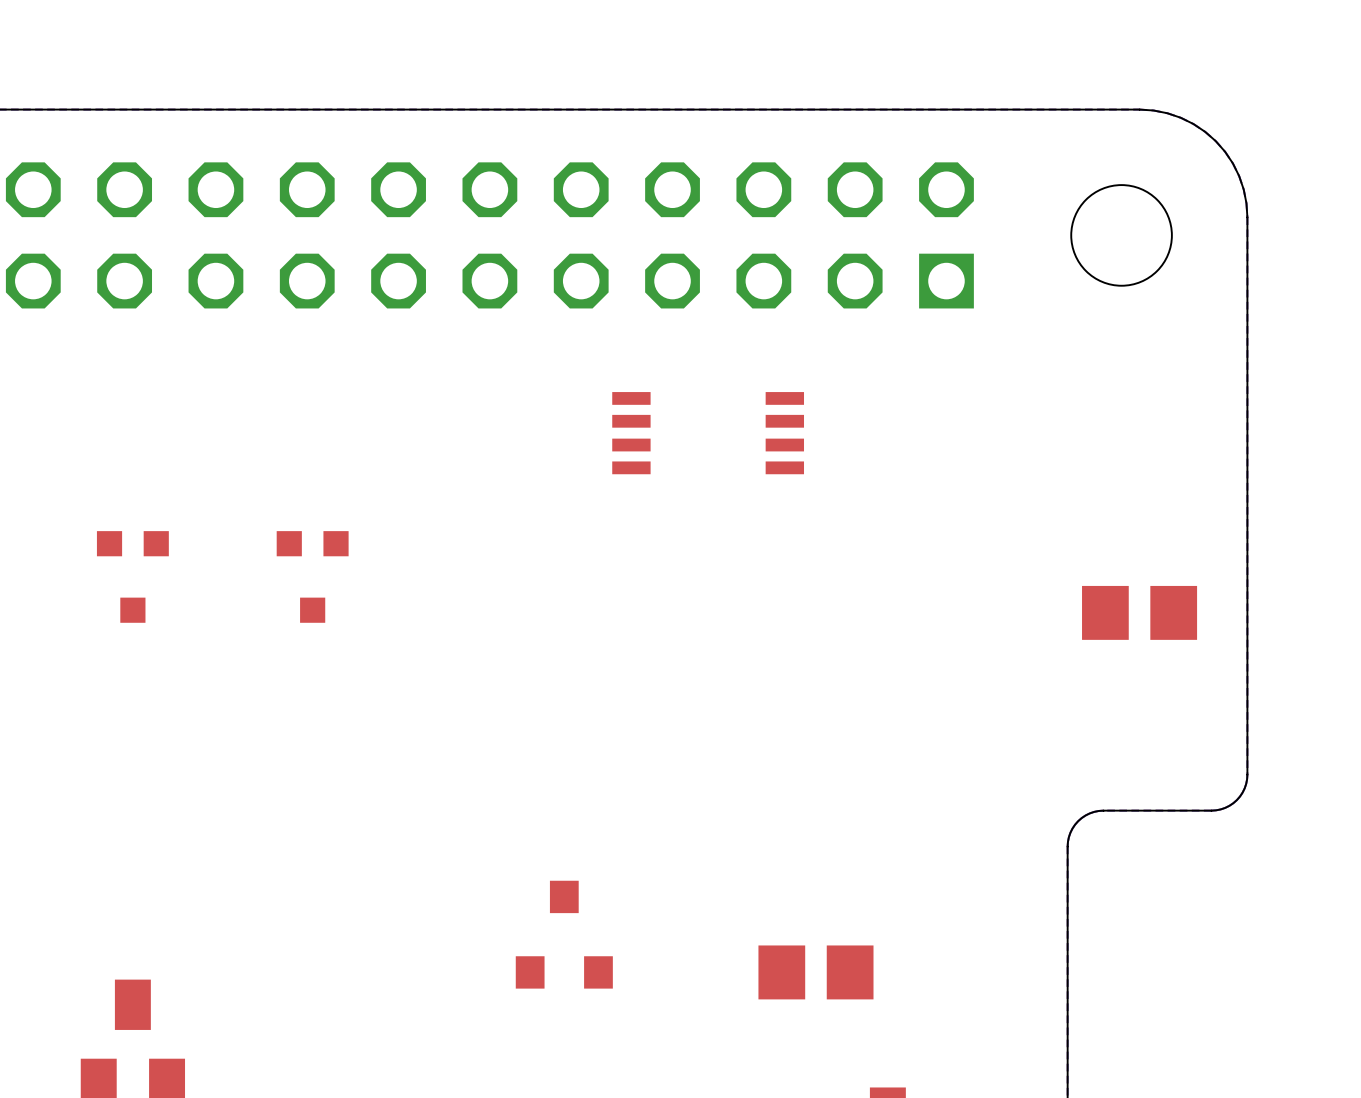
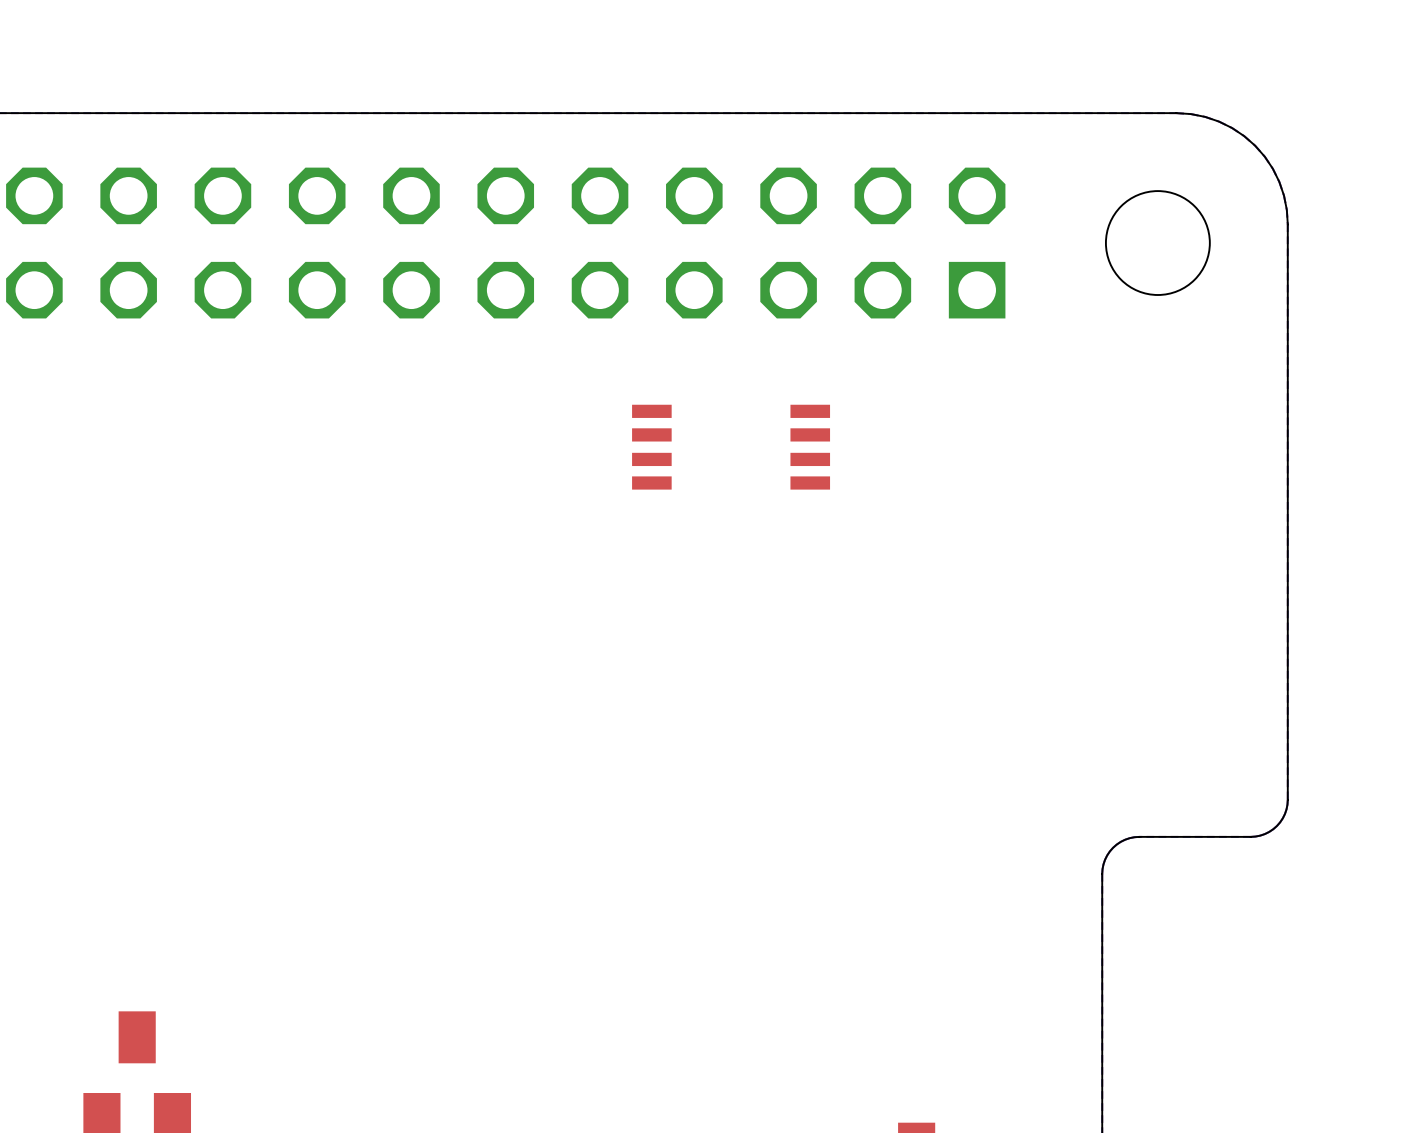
part: (132, 576) -> none
part: (312, 576) -> none
part: (1139, 612) -> none
part: (564, 934) -> none
part: (815, 972) -> none

